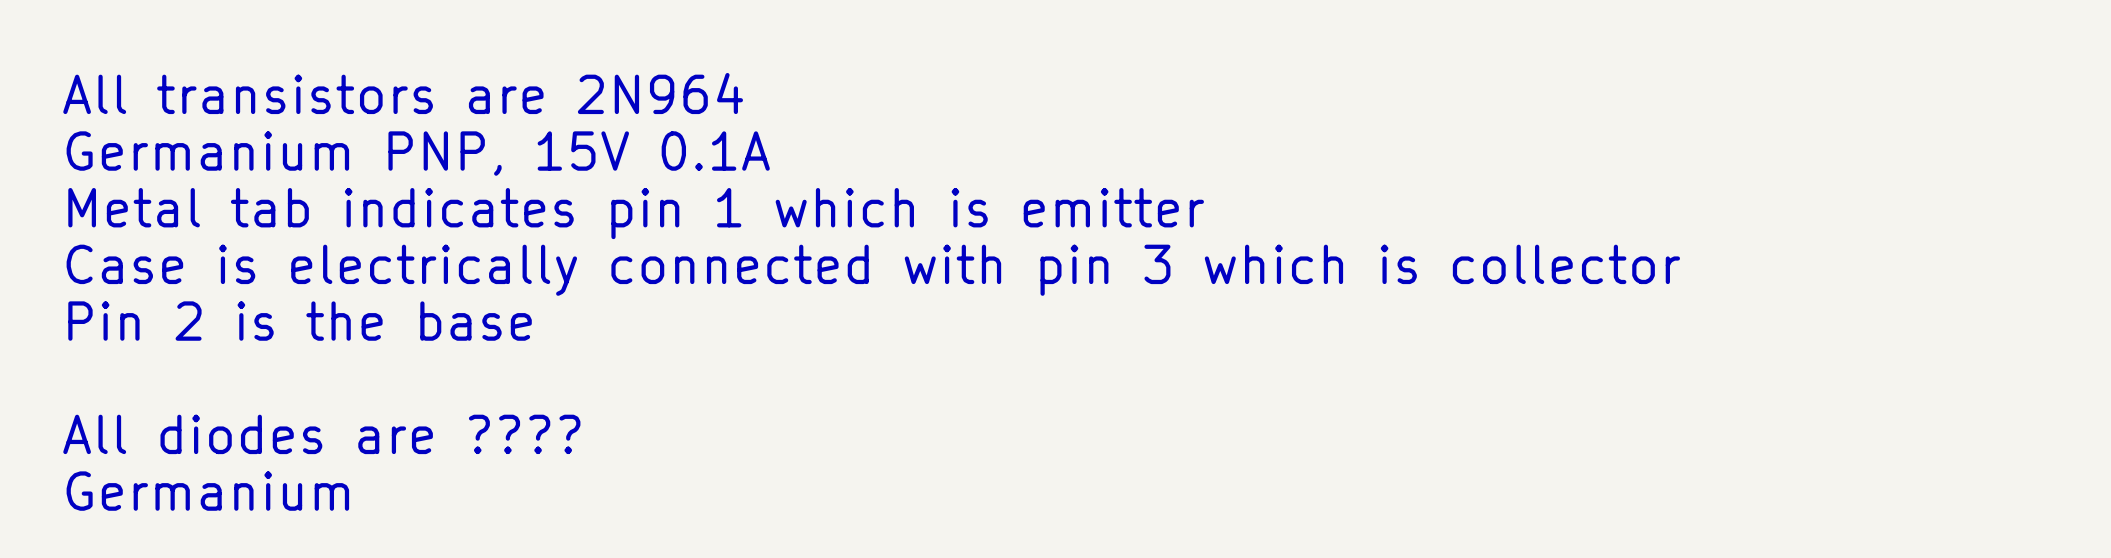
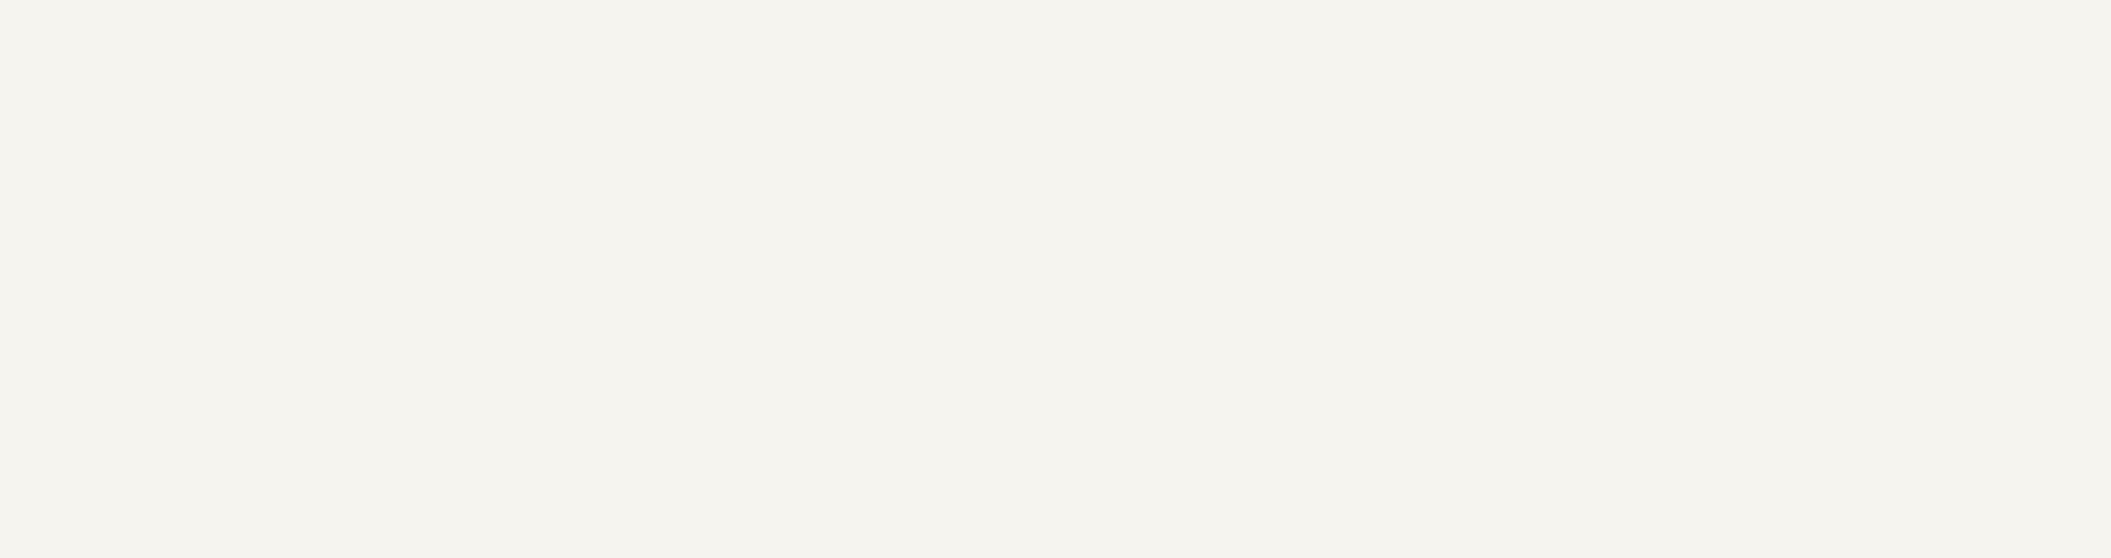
text: All transistors are 2N964 (403, 93) -> none
text: Germanium PNP, 15V 0.1A (418, 153) -> none
text: Metal tab indicates pin 1 which is emitter (636, 213) -> none
text: Case is electrically connected with pin 3 which is collector (873, 270) -> none
text: Pin 2 is the base (300, 321) -> none
text: All diodes are ???? (321, 434) -> none
text: Germanium (207, 491) -> none

